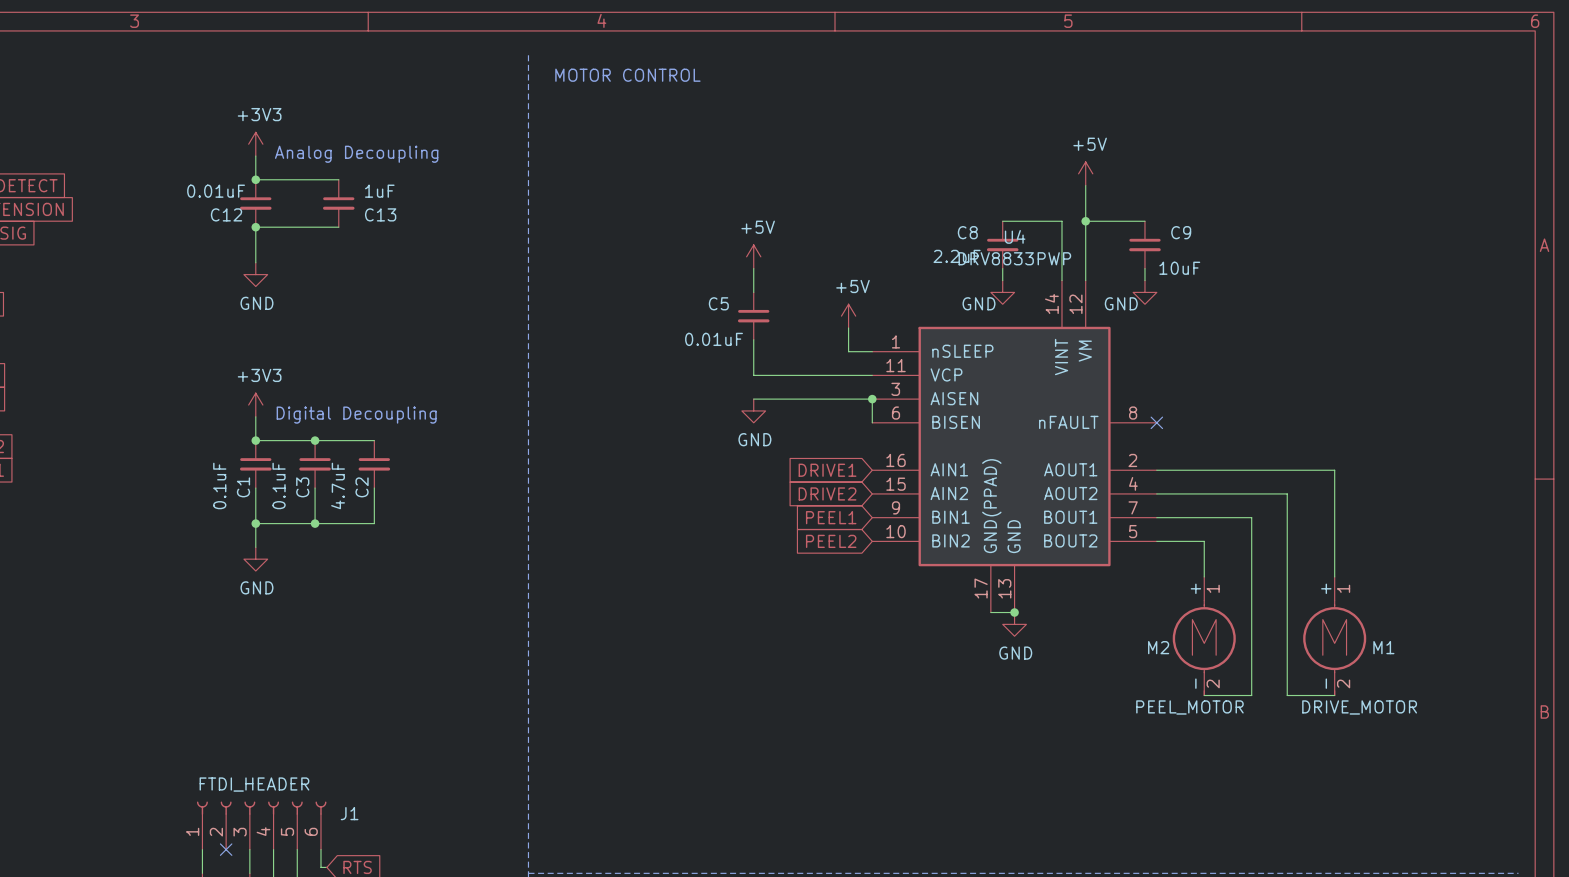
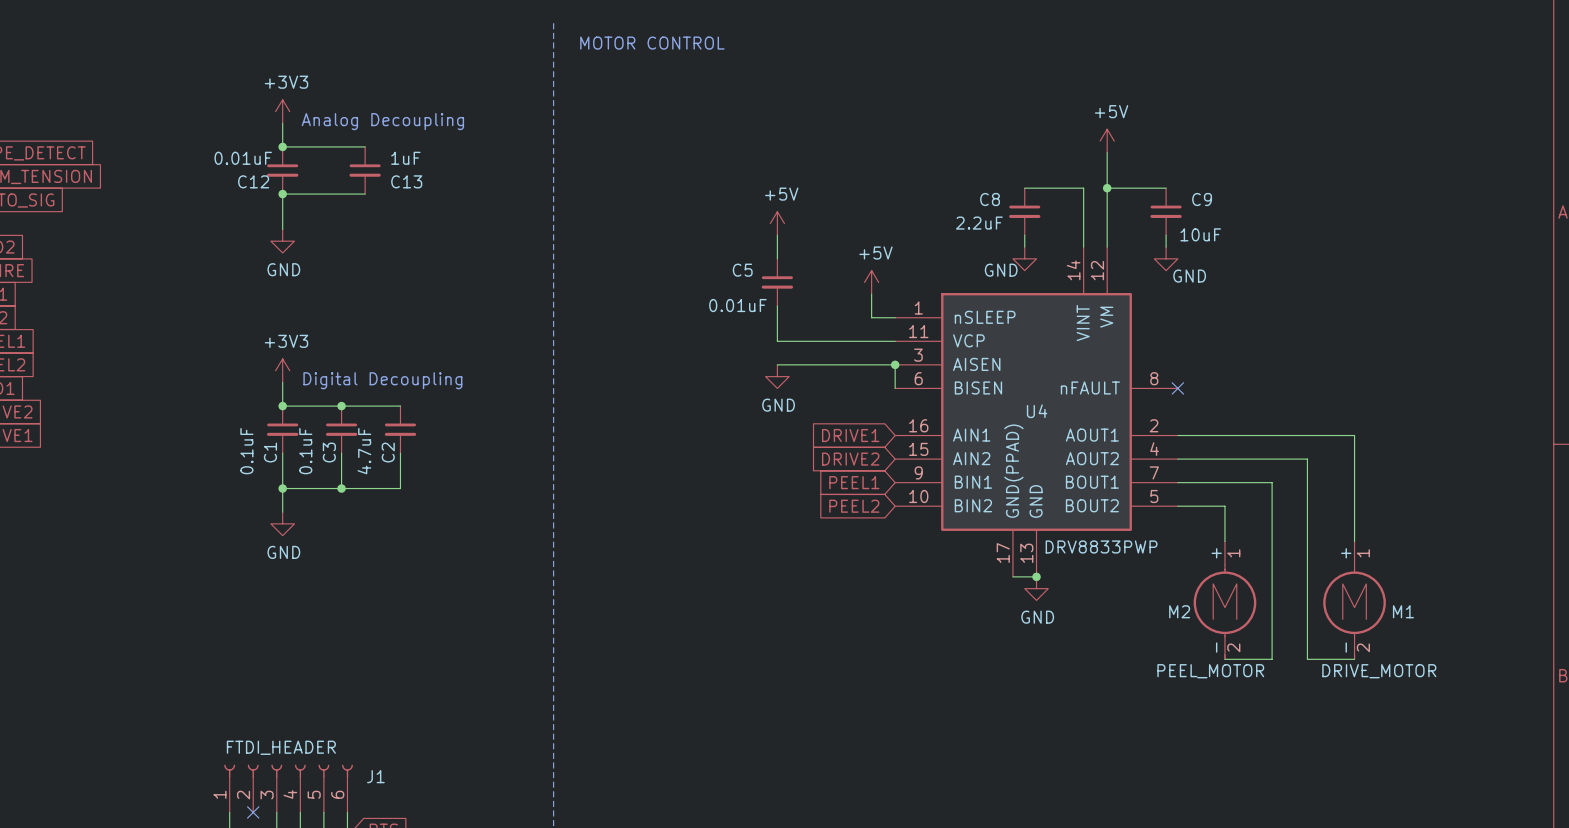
U4 name position: U4 (1015, 236) -> U4 (1037, 411)
U4 value position: DRV8833PWP (1014, 258) -> DRV8833PWP (1101, 546)
power symbol text position: GND (1121, 303) -> GND (1189, 276)

